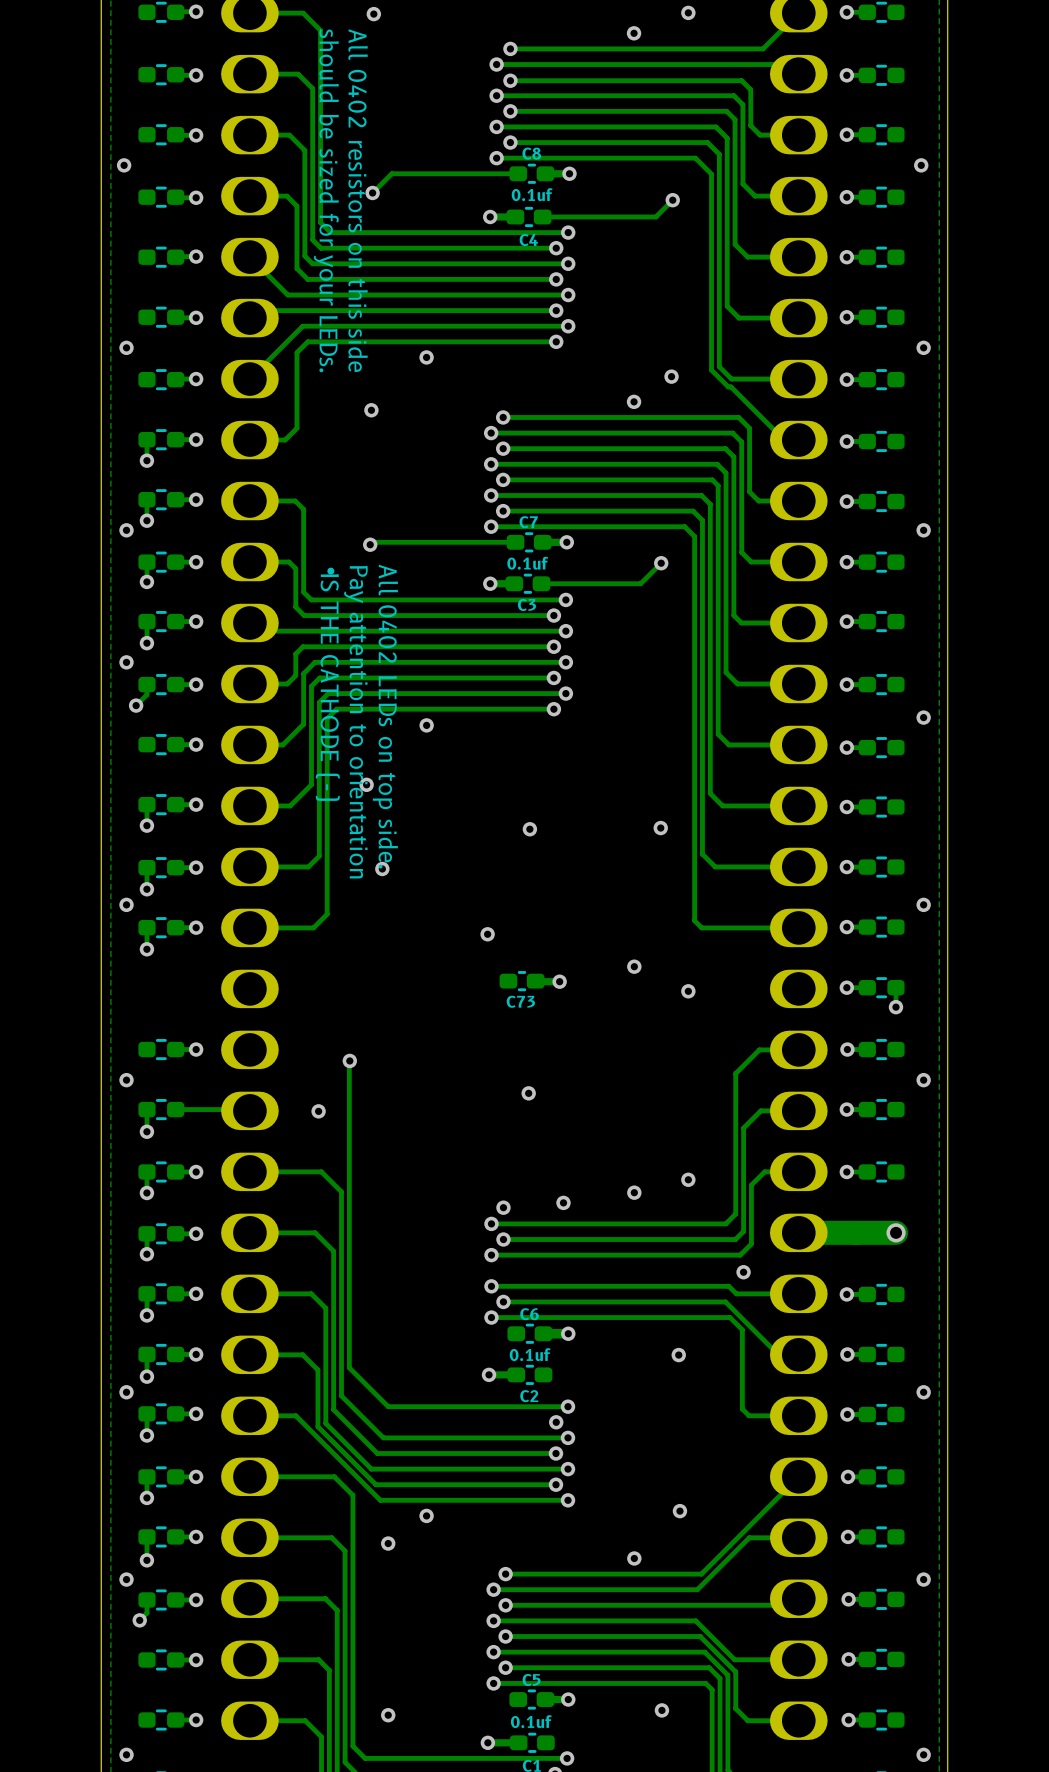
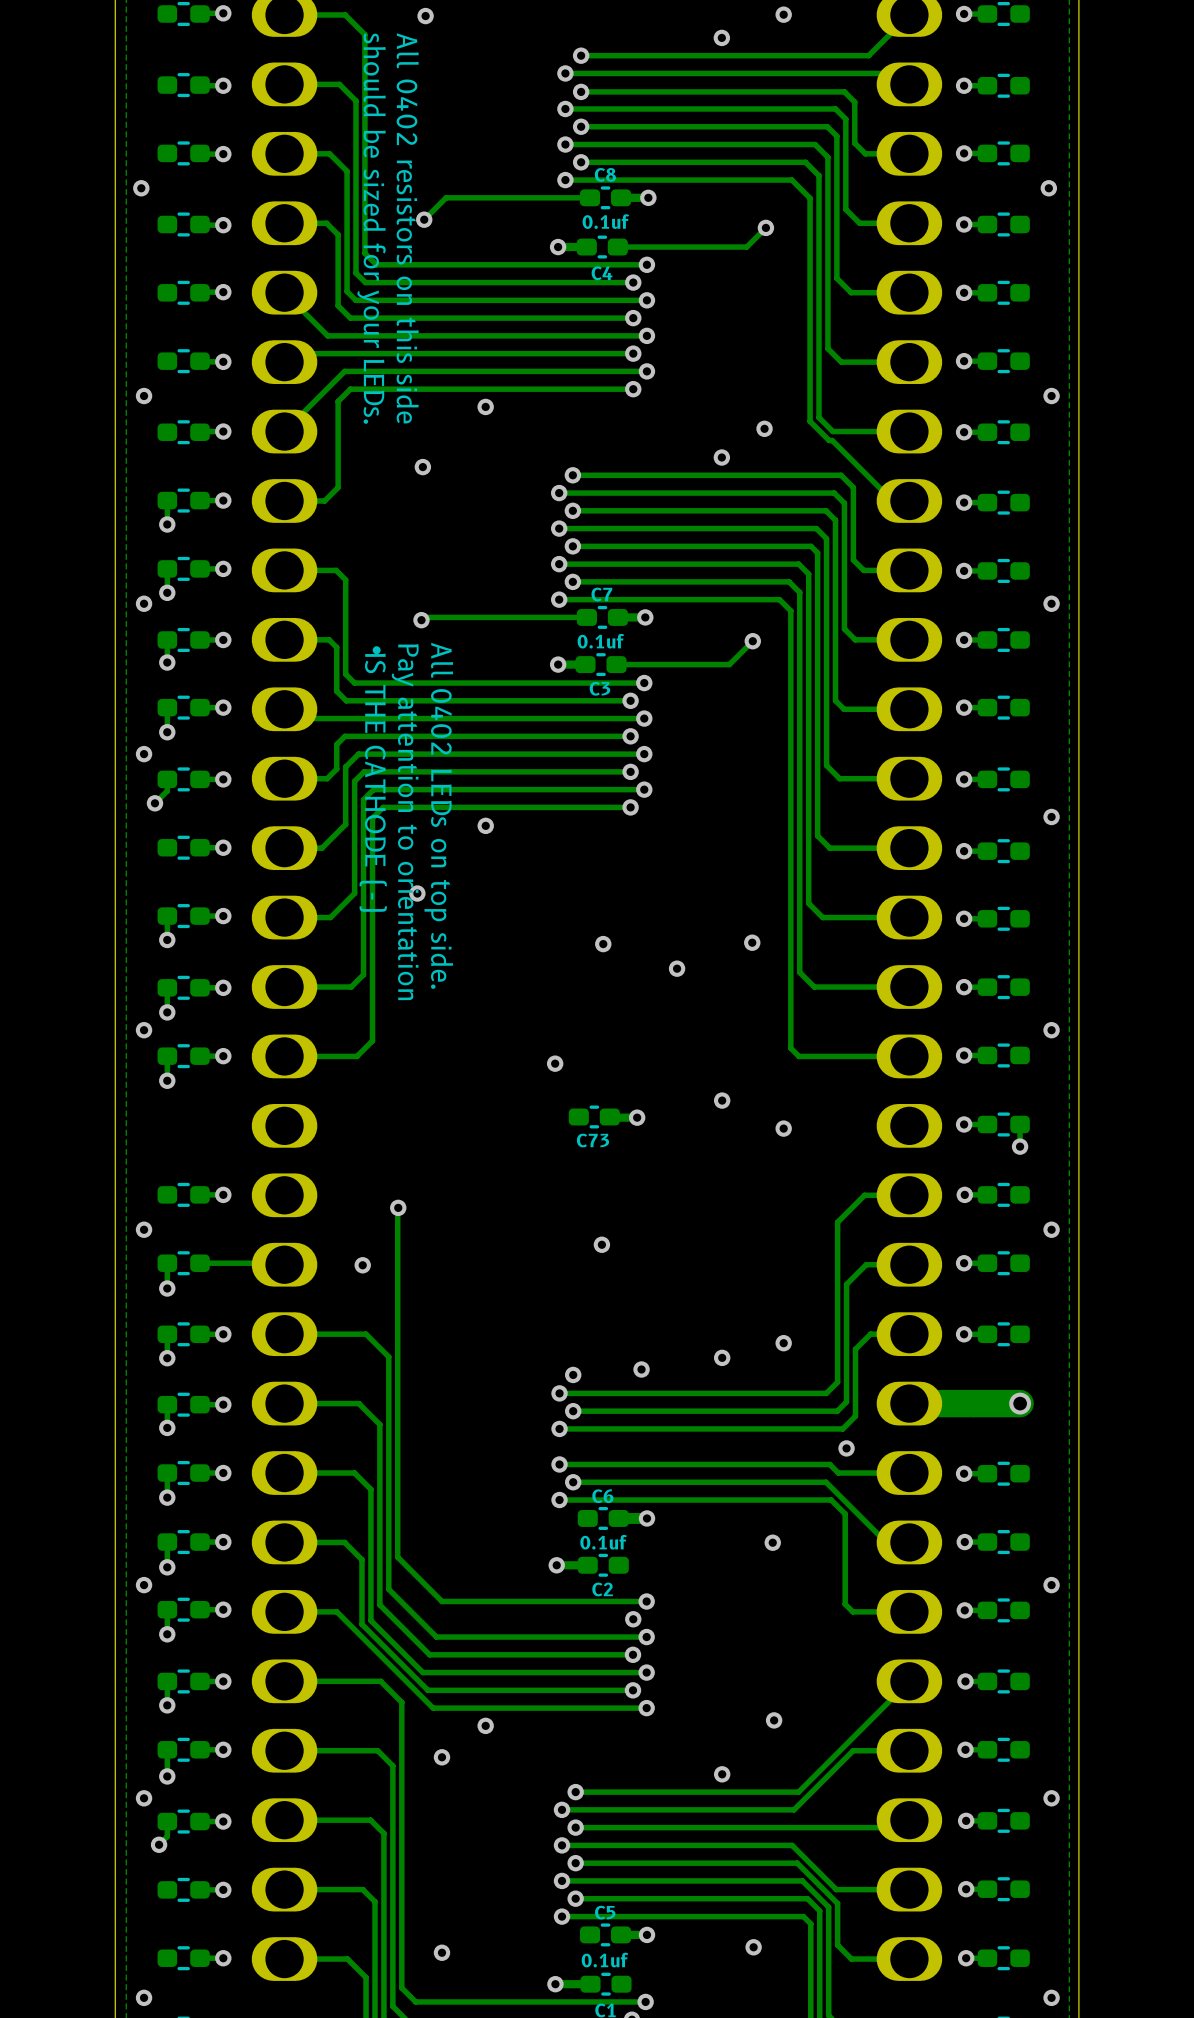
via: none -> (677, 968)
via: (382, 868) -> none

